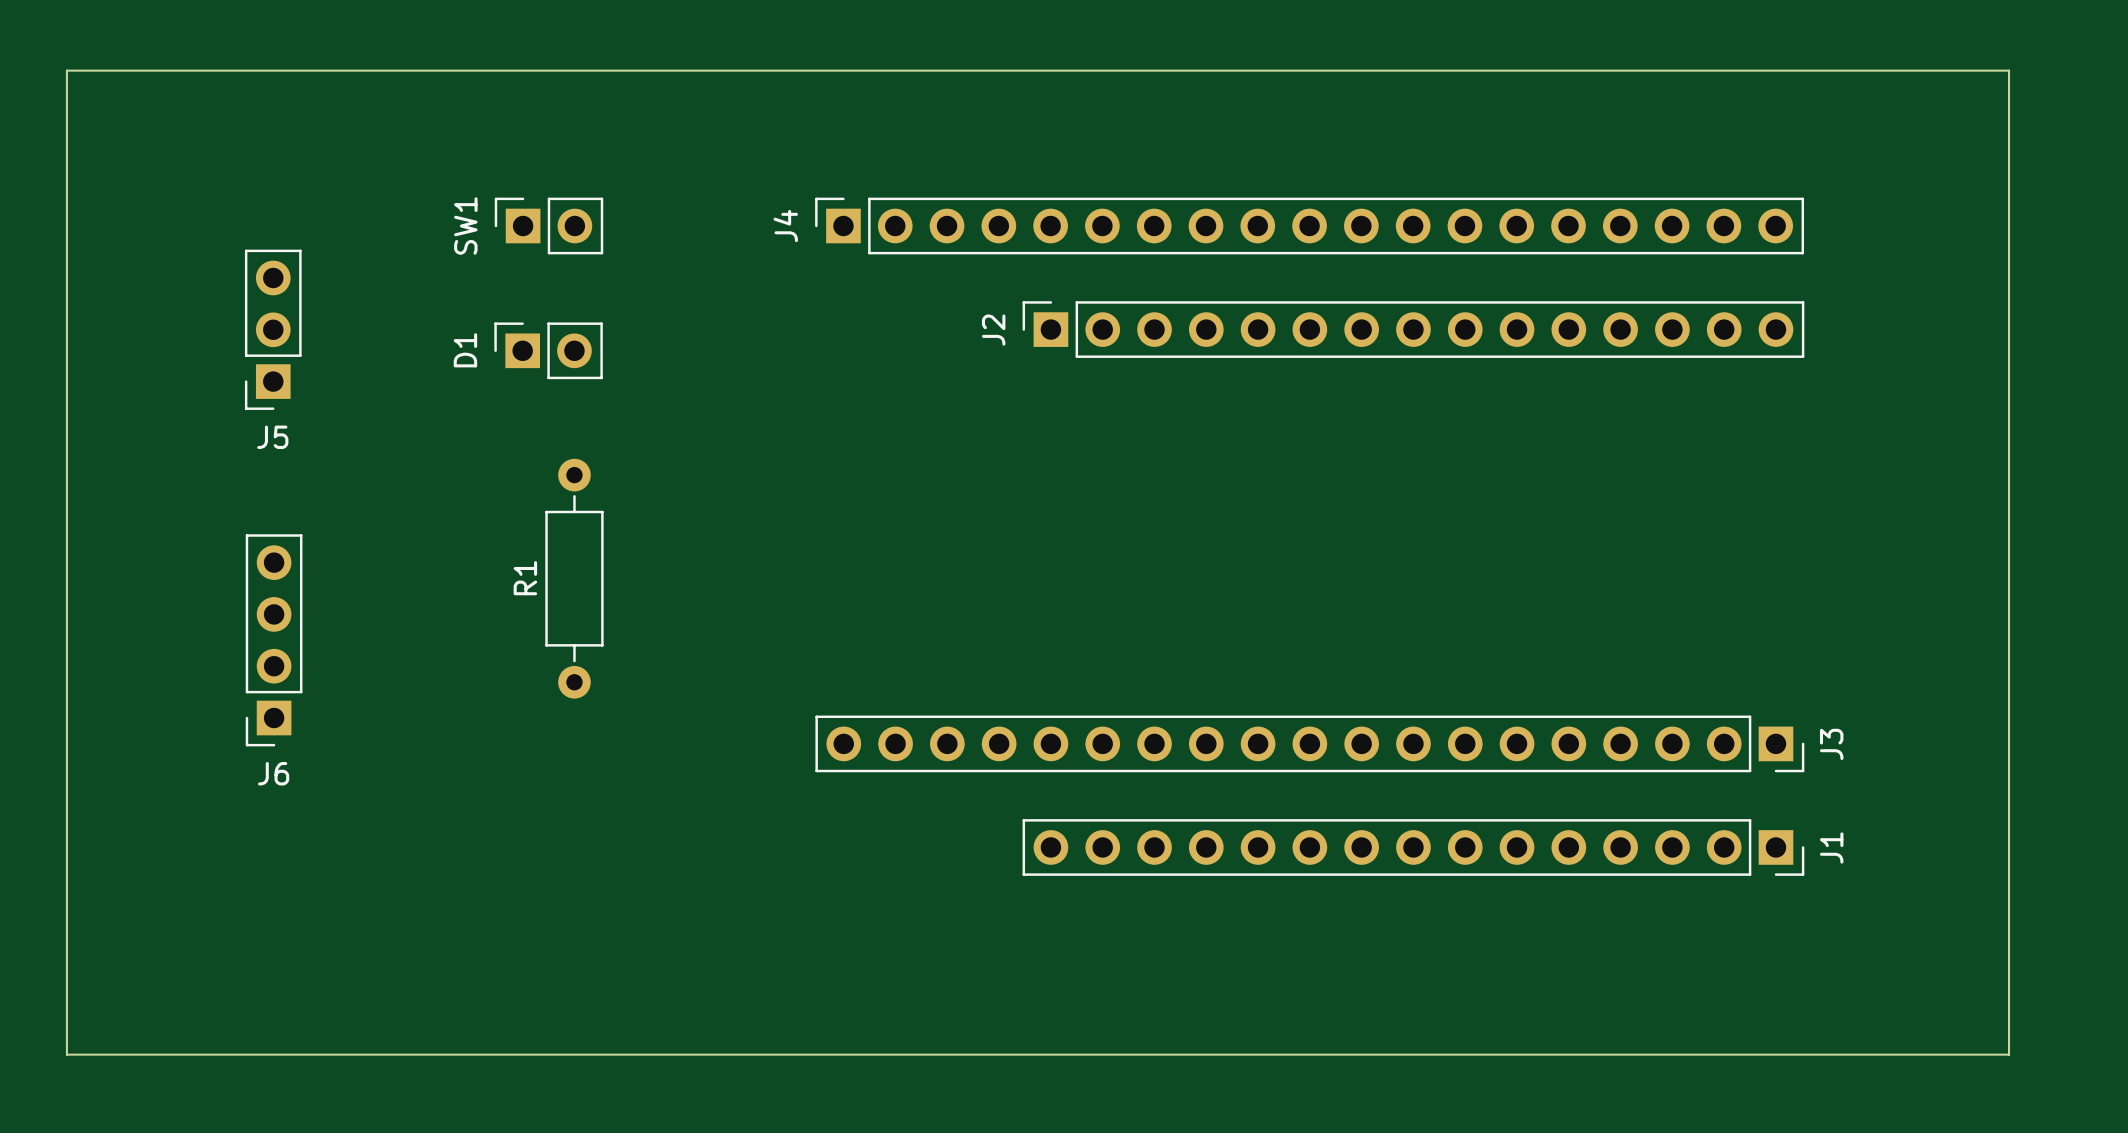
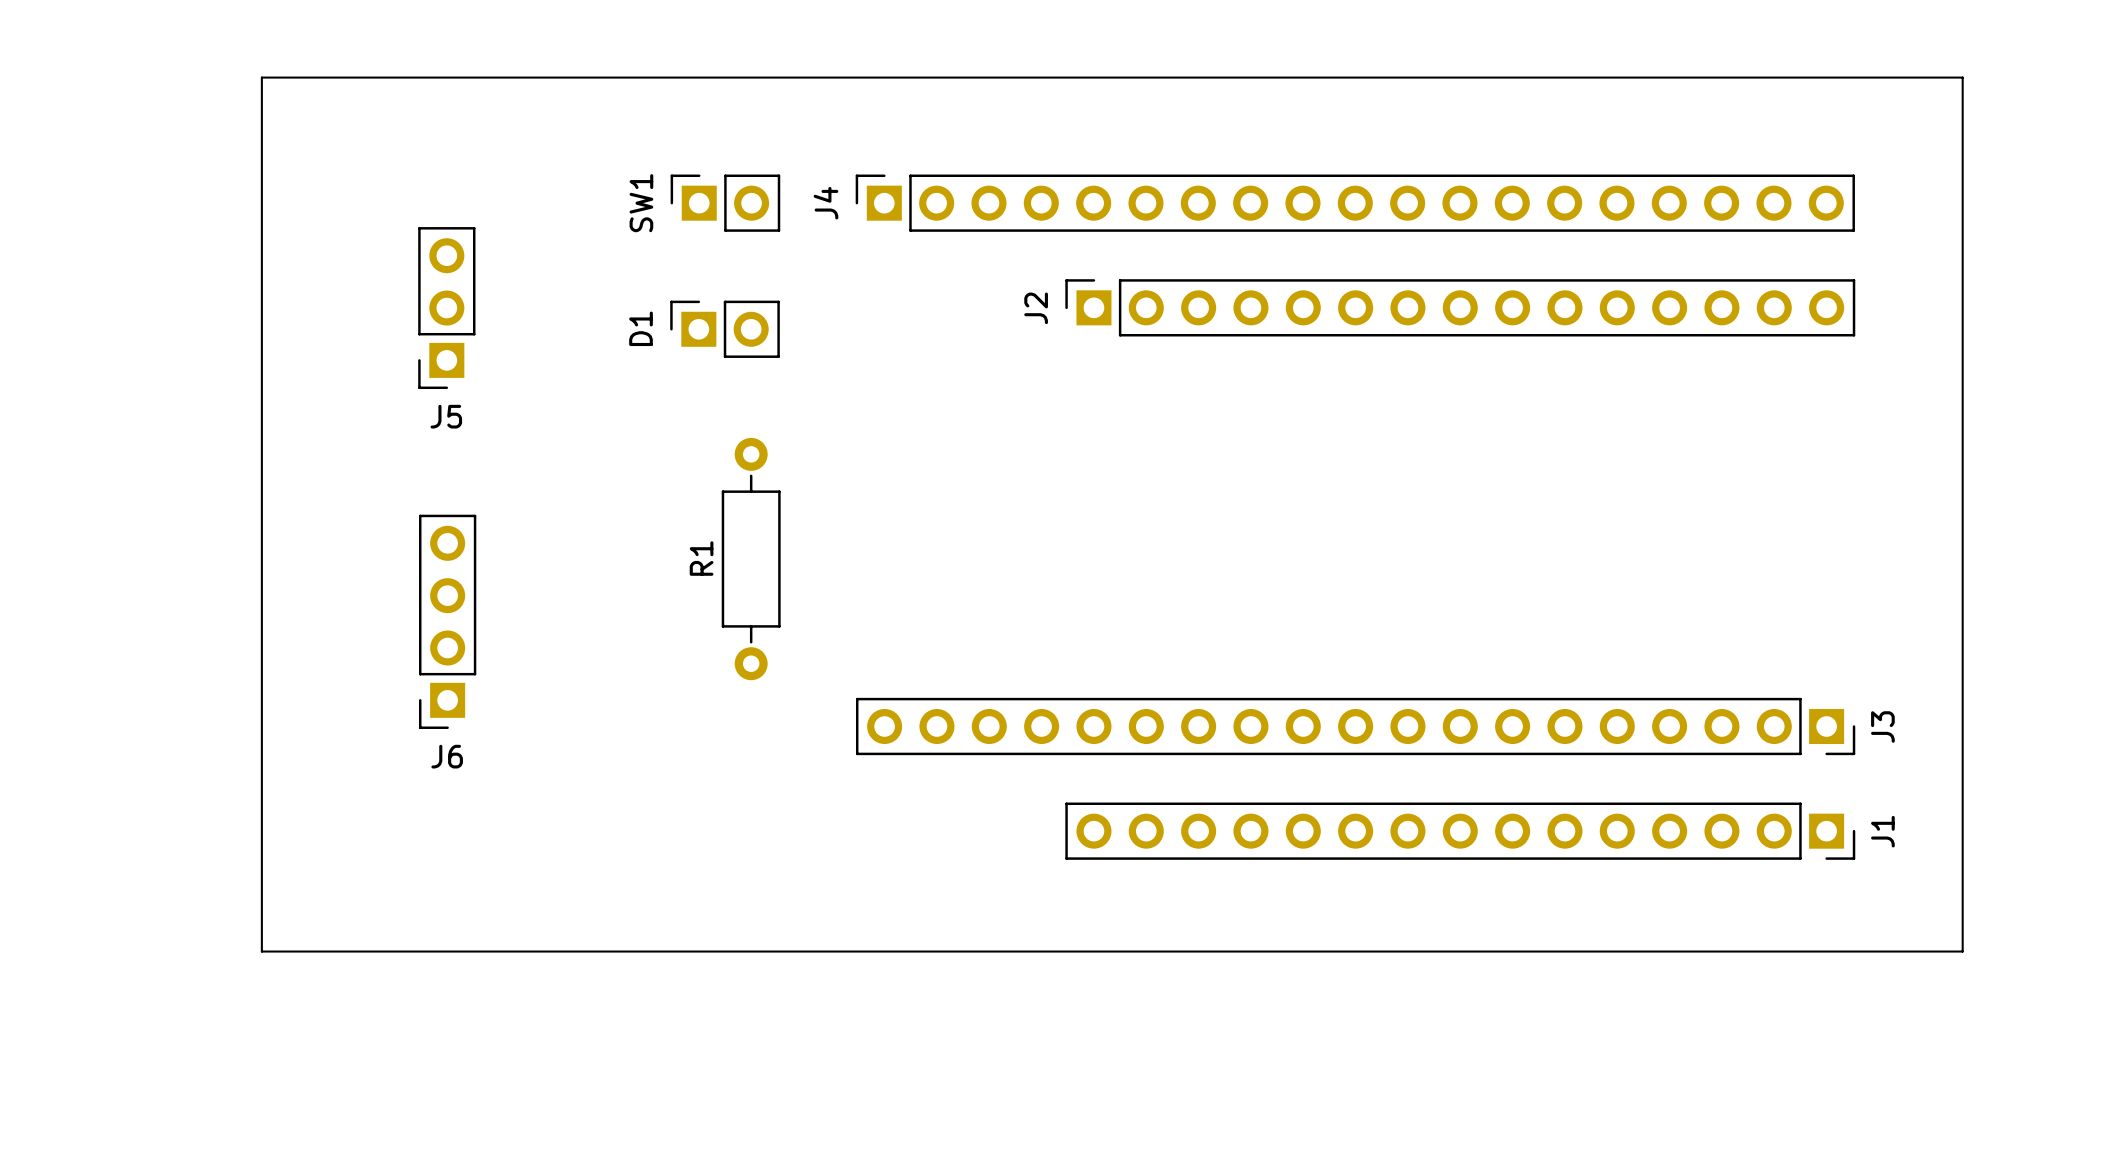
board edge: (66, 70) (66, 1054) (2009, 1054) (2009, 70) (66, 70) -> (261, 77) (261, 951) (1962, 951) (1962, 77) (261, 77)
SW1 position: (548, 226) -> (725, 203)
J5 position: (273, 329) -> (446, 308)
D1 position: (548, 350) -> (725, 329)
R1 position: (574, 578) -> (751, 559)
J6 position: (274, 640) -> (447, 621)

